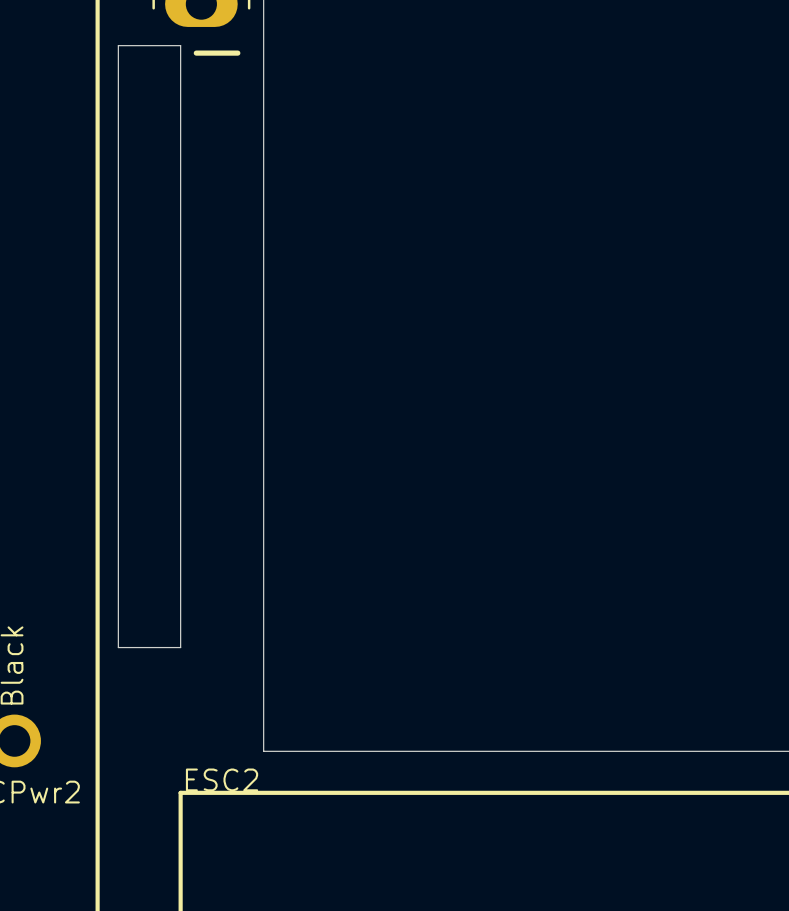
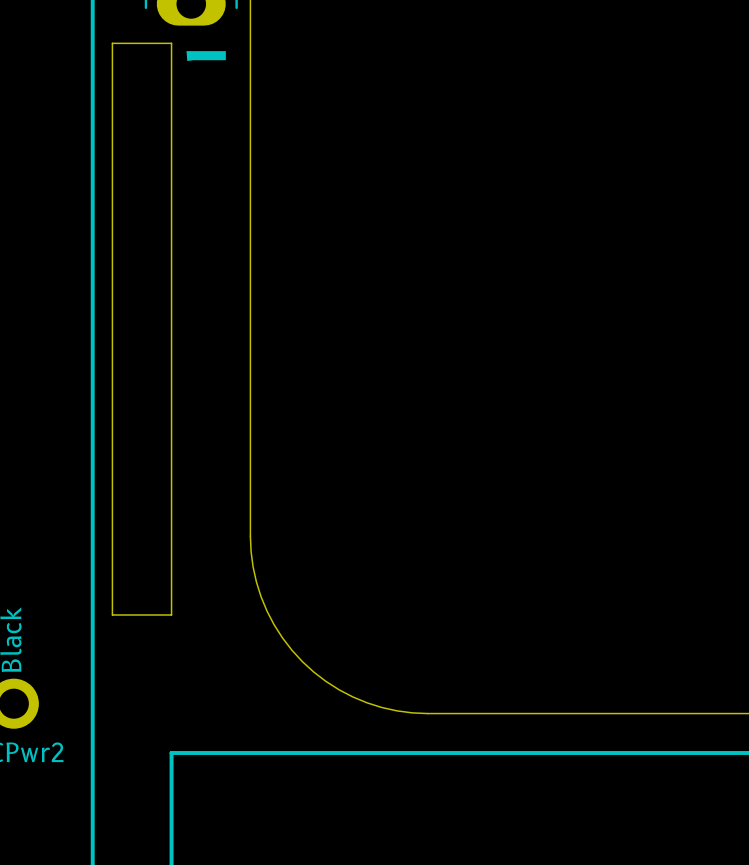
board edge: (263, 564) (263, 751) (450, 751) -> (250, 536) (253, 566) (261, 596) (274, 624) (302, 661) (326, 681) (352, 696) (397, 710) (427, 713)
text: ESC2 (222, 779) -> none

